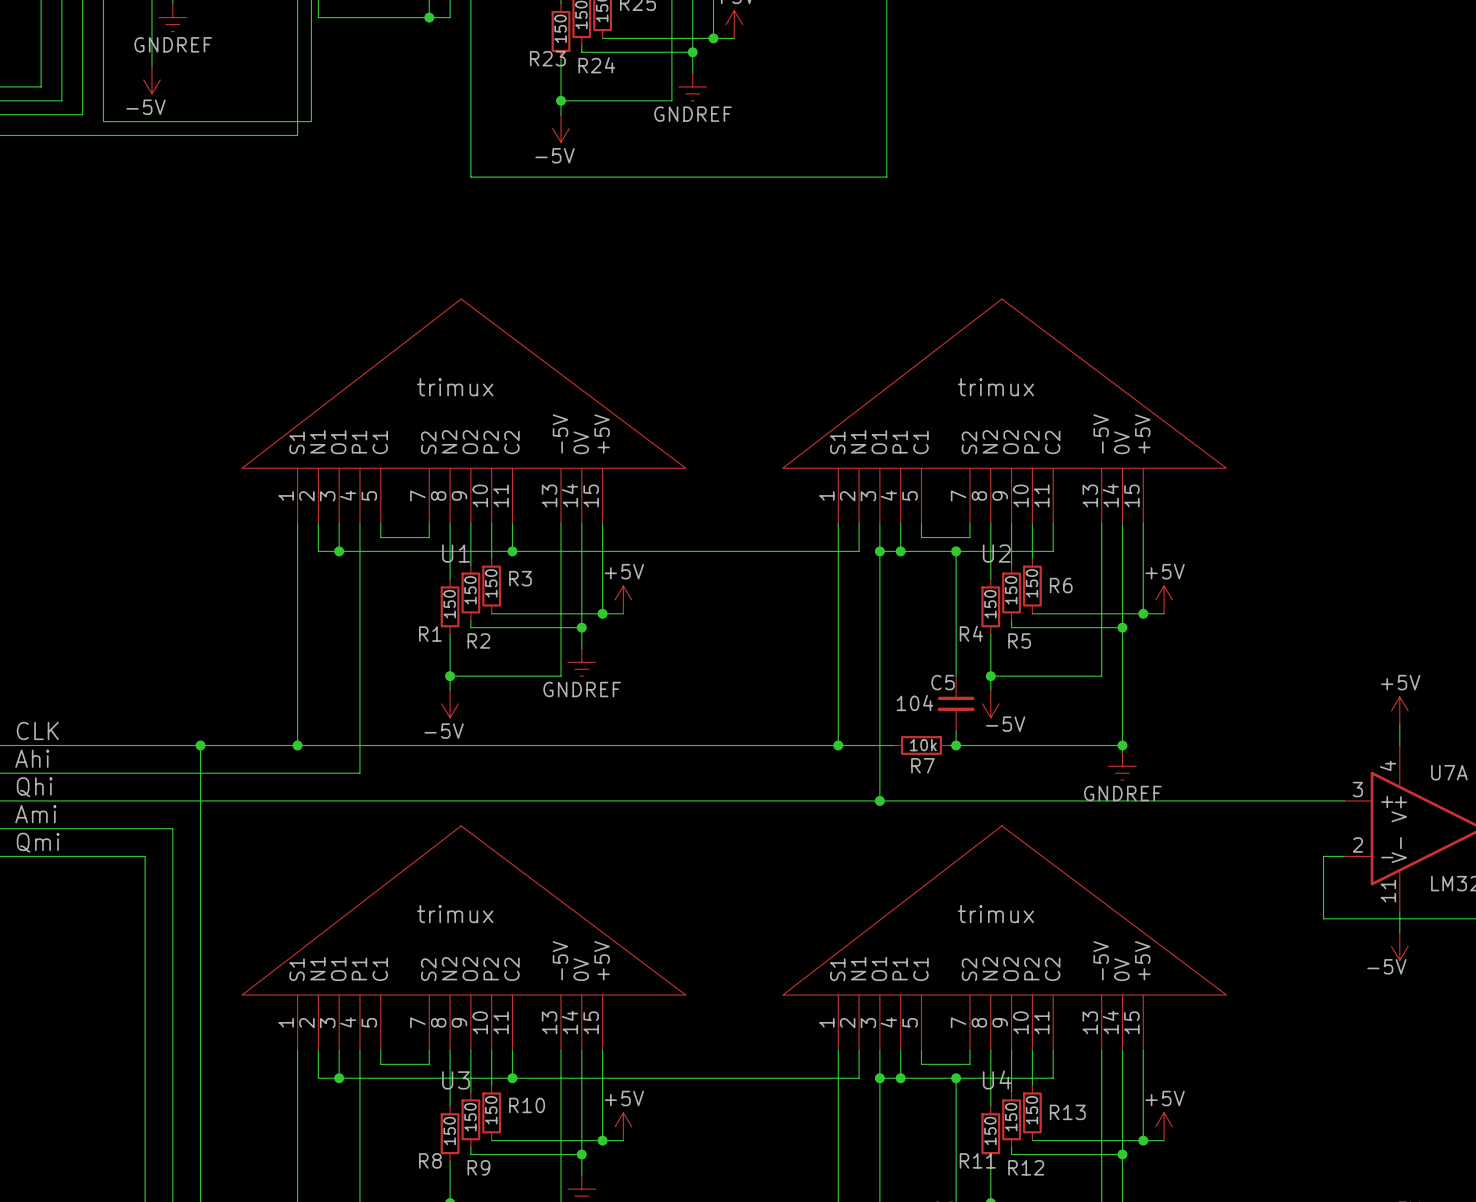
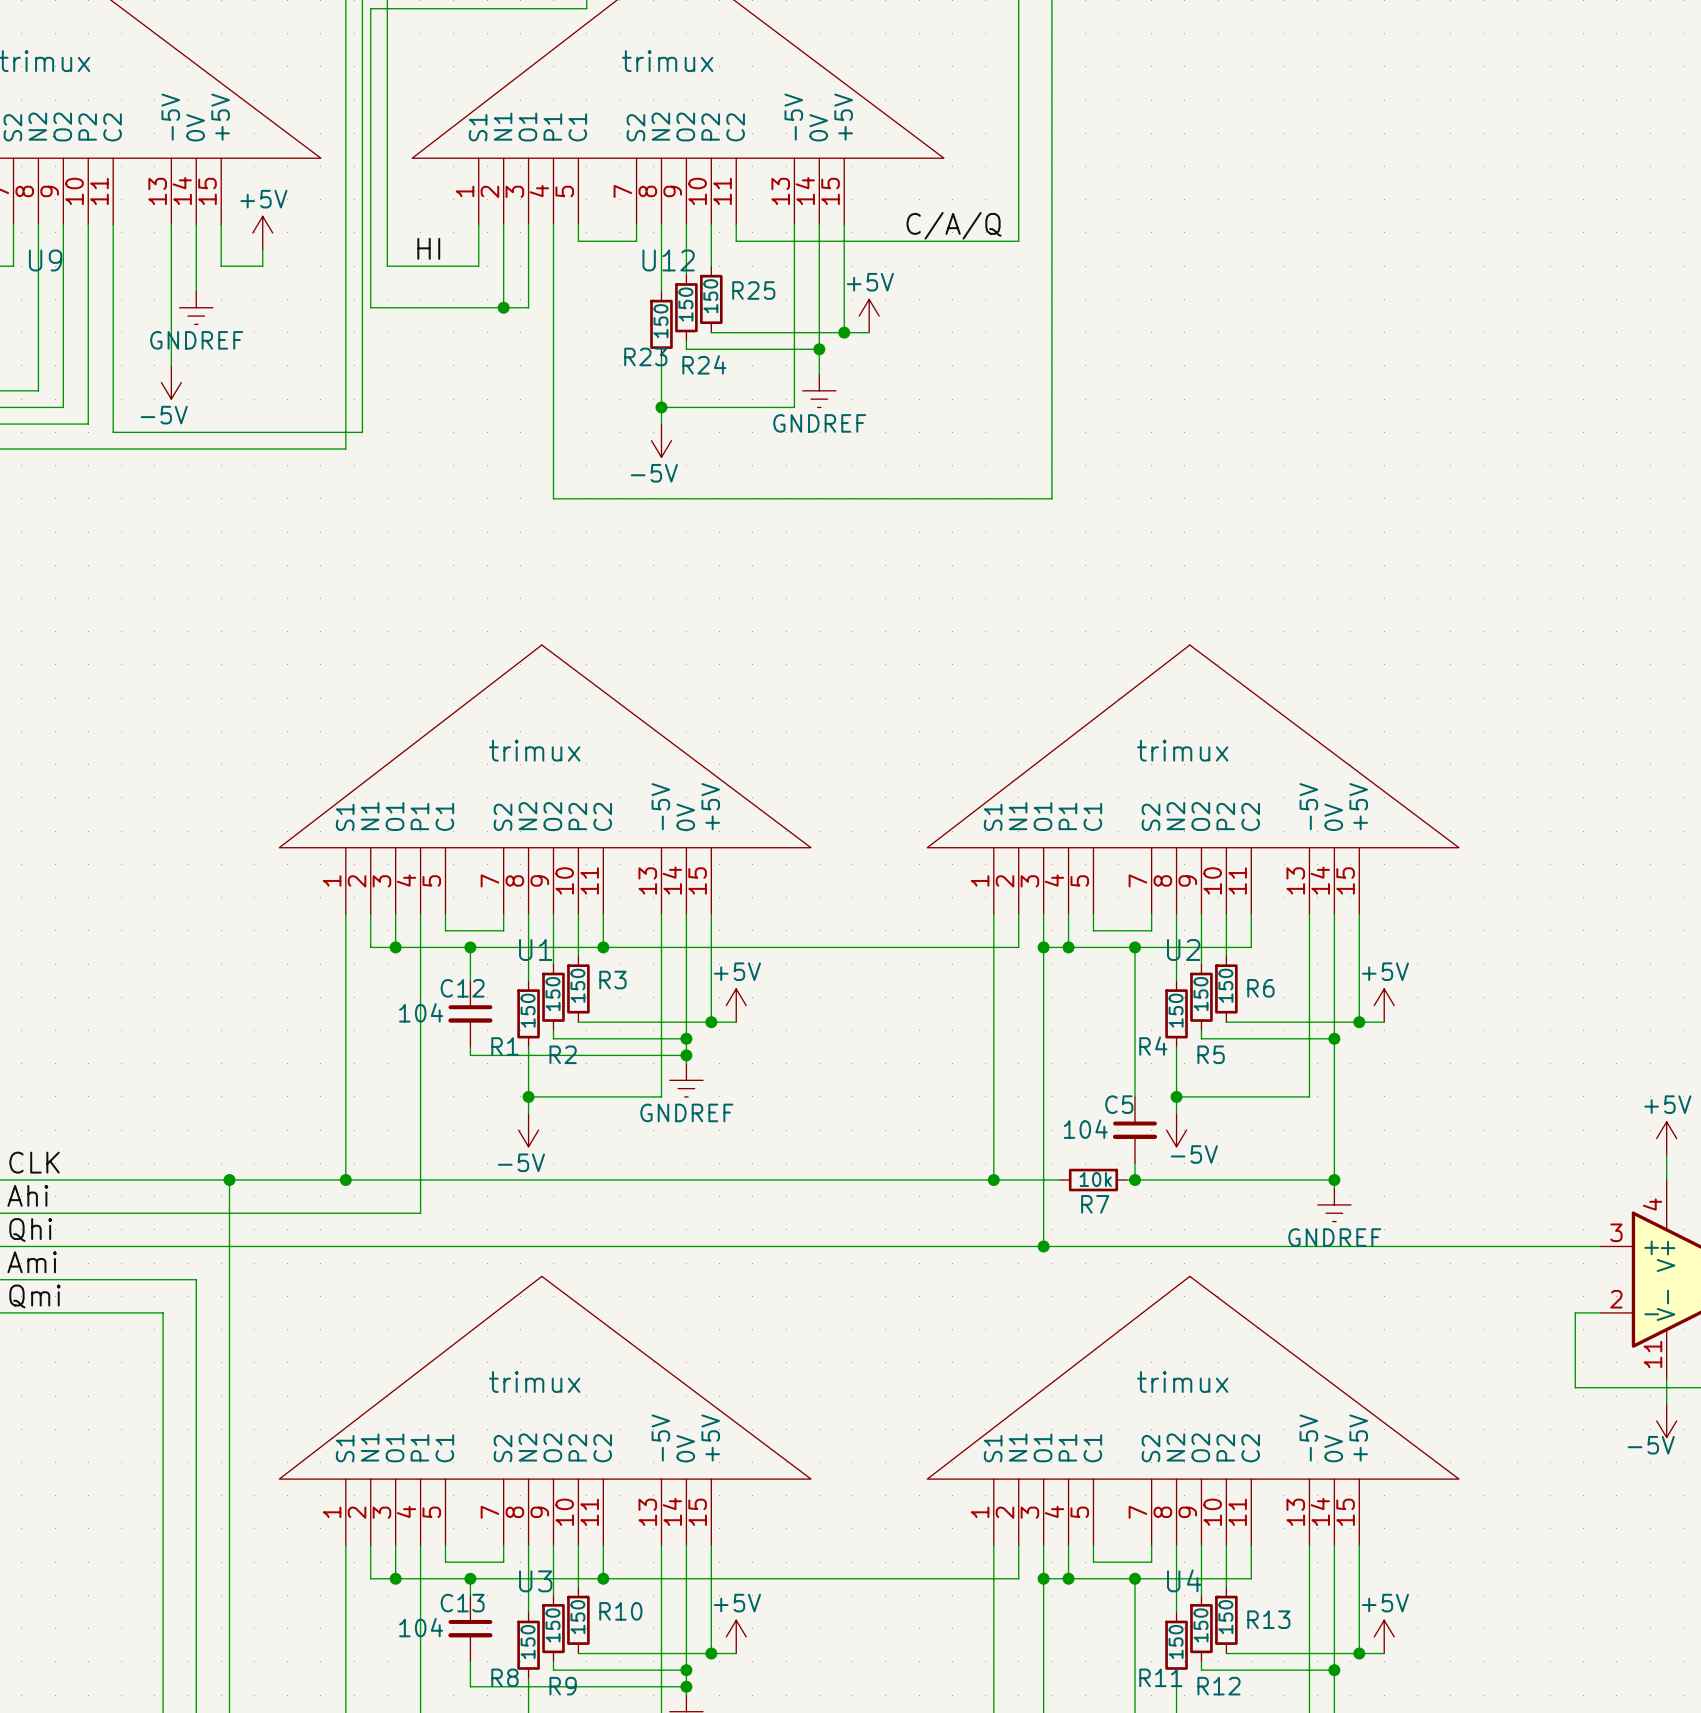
wire: none -> (470, 947) (470, 980)
junction: none -> (470, 947)
C12: none -> 104 (470, 1013)
wire: none -> (470, 1047) (470, 1055) (686, 1055)
junction: none -> (686, 1055)
wire: none -> (470, 1578) (470, 1595)
junction: none -> (470, 1578)
C13: none -> 104 (470, 1628)
wire: none -> (470, 1661) (470, 1686) (686, 1686)
junction: none -> (686, 1686)

